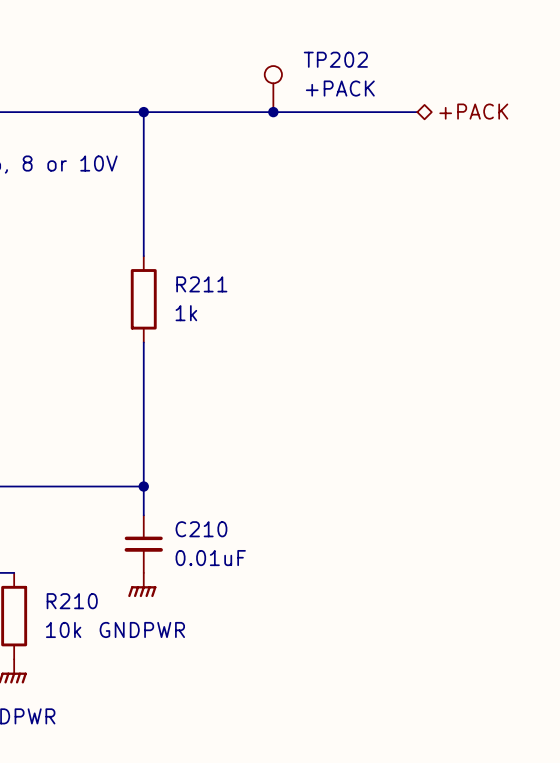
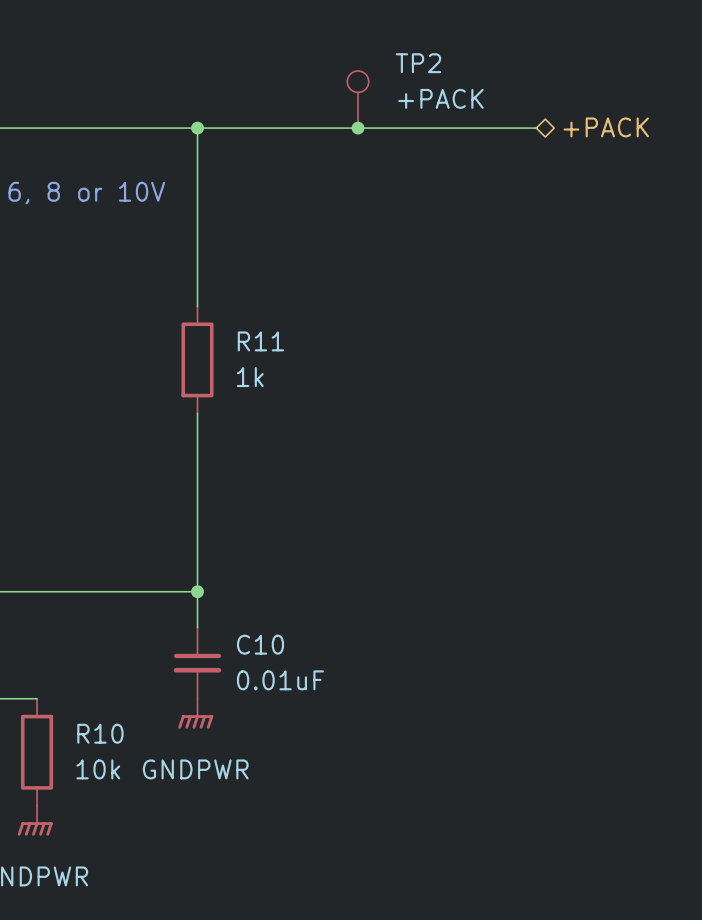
TP202 name: TP202 (335, 59) -> TP2 (418, 63)
R211 name: R211 (201, 284) -> R11 (260, 341)
C210 name: C210 (201, 529) -> C10 (260, 644)
R210 name: R210 (72, 601) -> R10 (100, 733)

